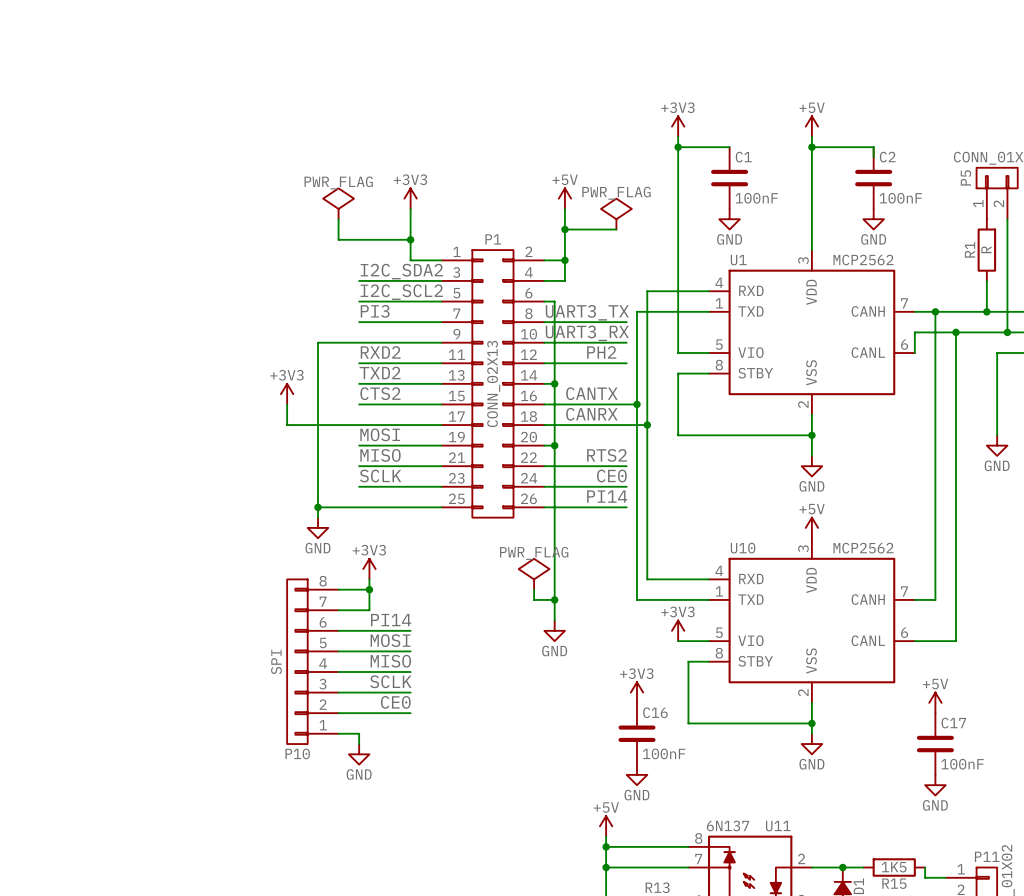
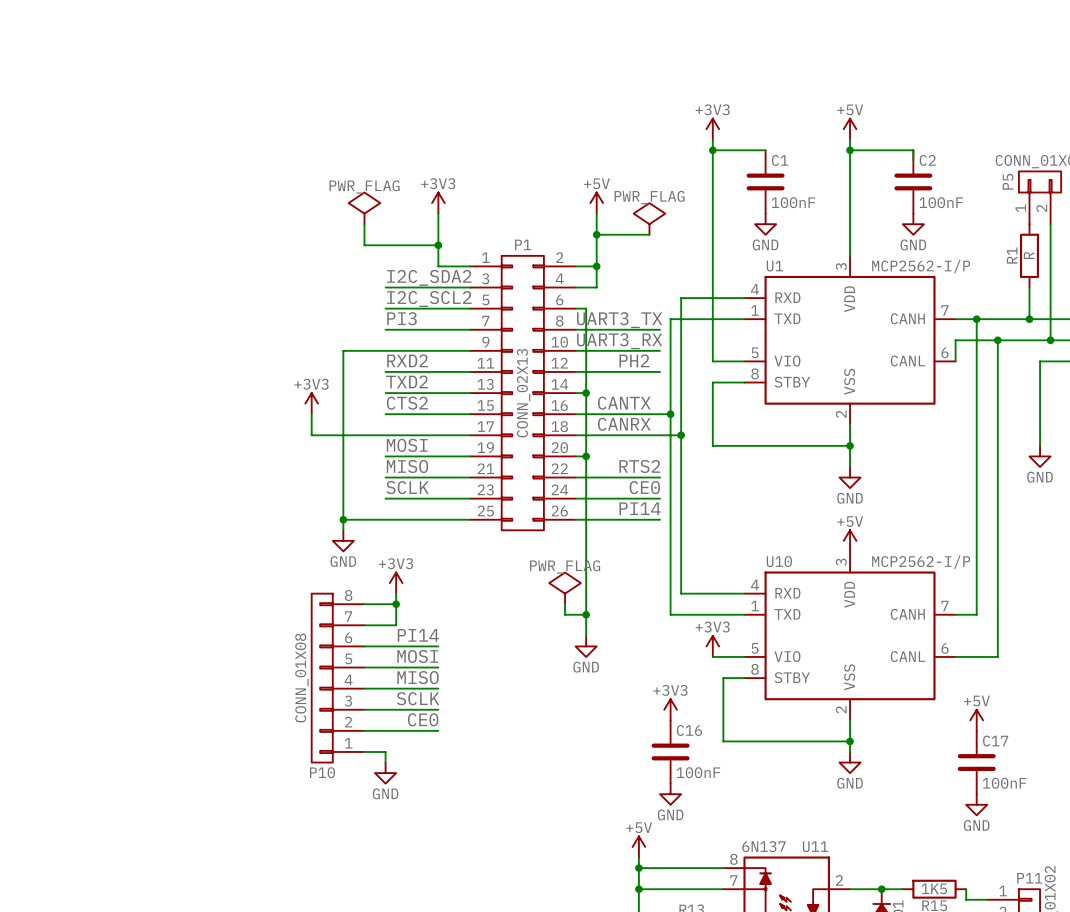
U1 value: MCP2562 (863, 260) -> MCP2562-I/P (921, 266)
U10 value: MCP2562 (863, 548) -> MCP2562-I/P (921, 562)
P10 value: SPI (276, 662) -> CONN_01X08 (301, 677)

